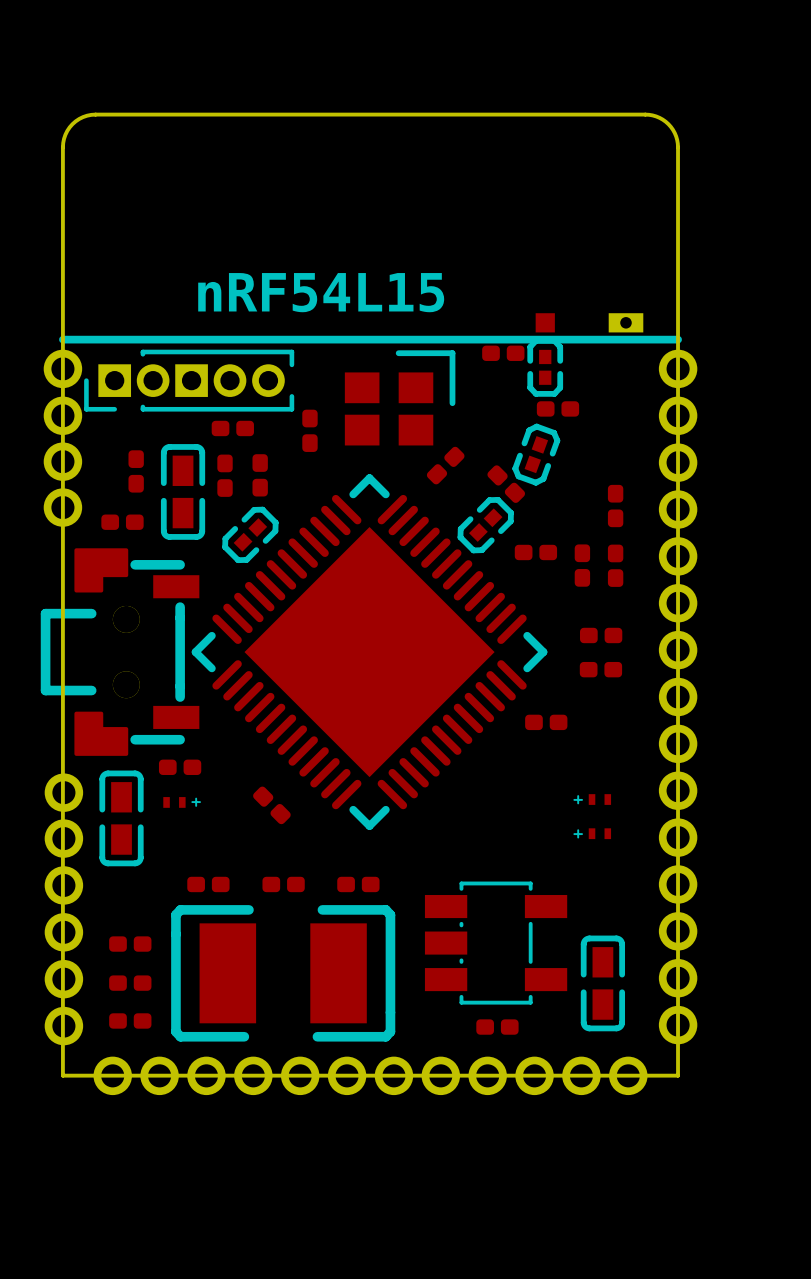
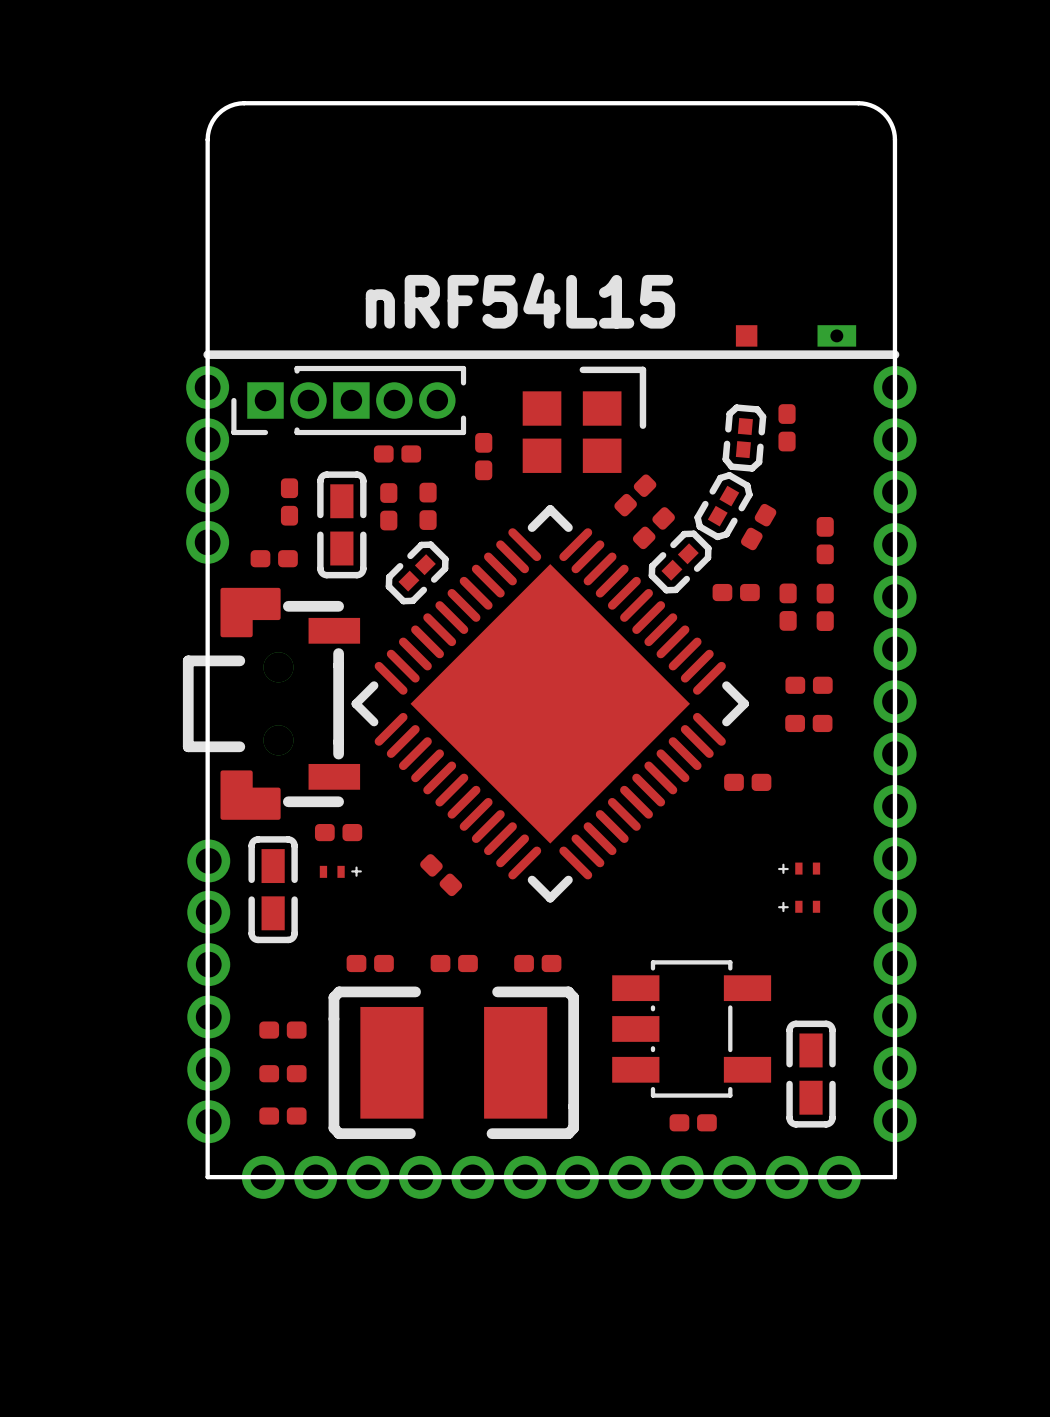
part: (503, 353) -> none
part: (545, 367) -> none
part rotation: 0° (557, 408) -> 90° clockwise (787, 427)
part: none -> (744, 438)
part: (536, 454) -> none
part: none -> (723, 506)
part rotation: 0° (506, 484) -> 90° clockwise (653, 528)
part position: (506, 484) -> (653, 528)
part: none -> (758, 527)

